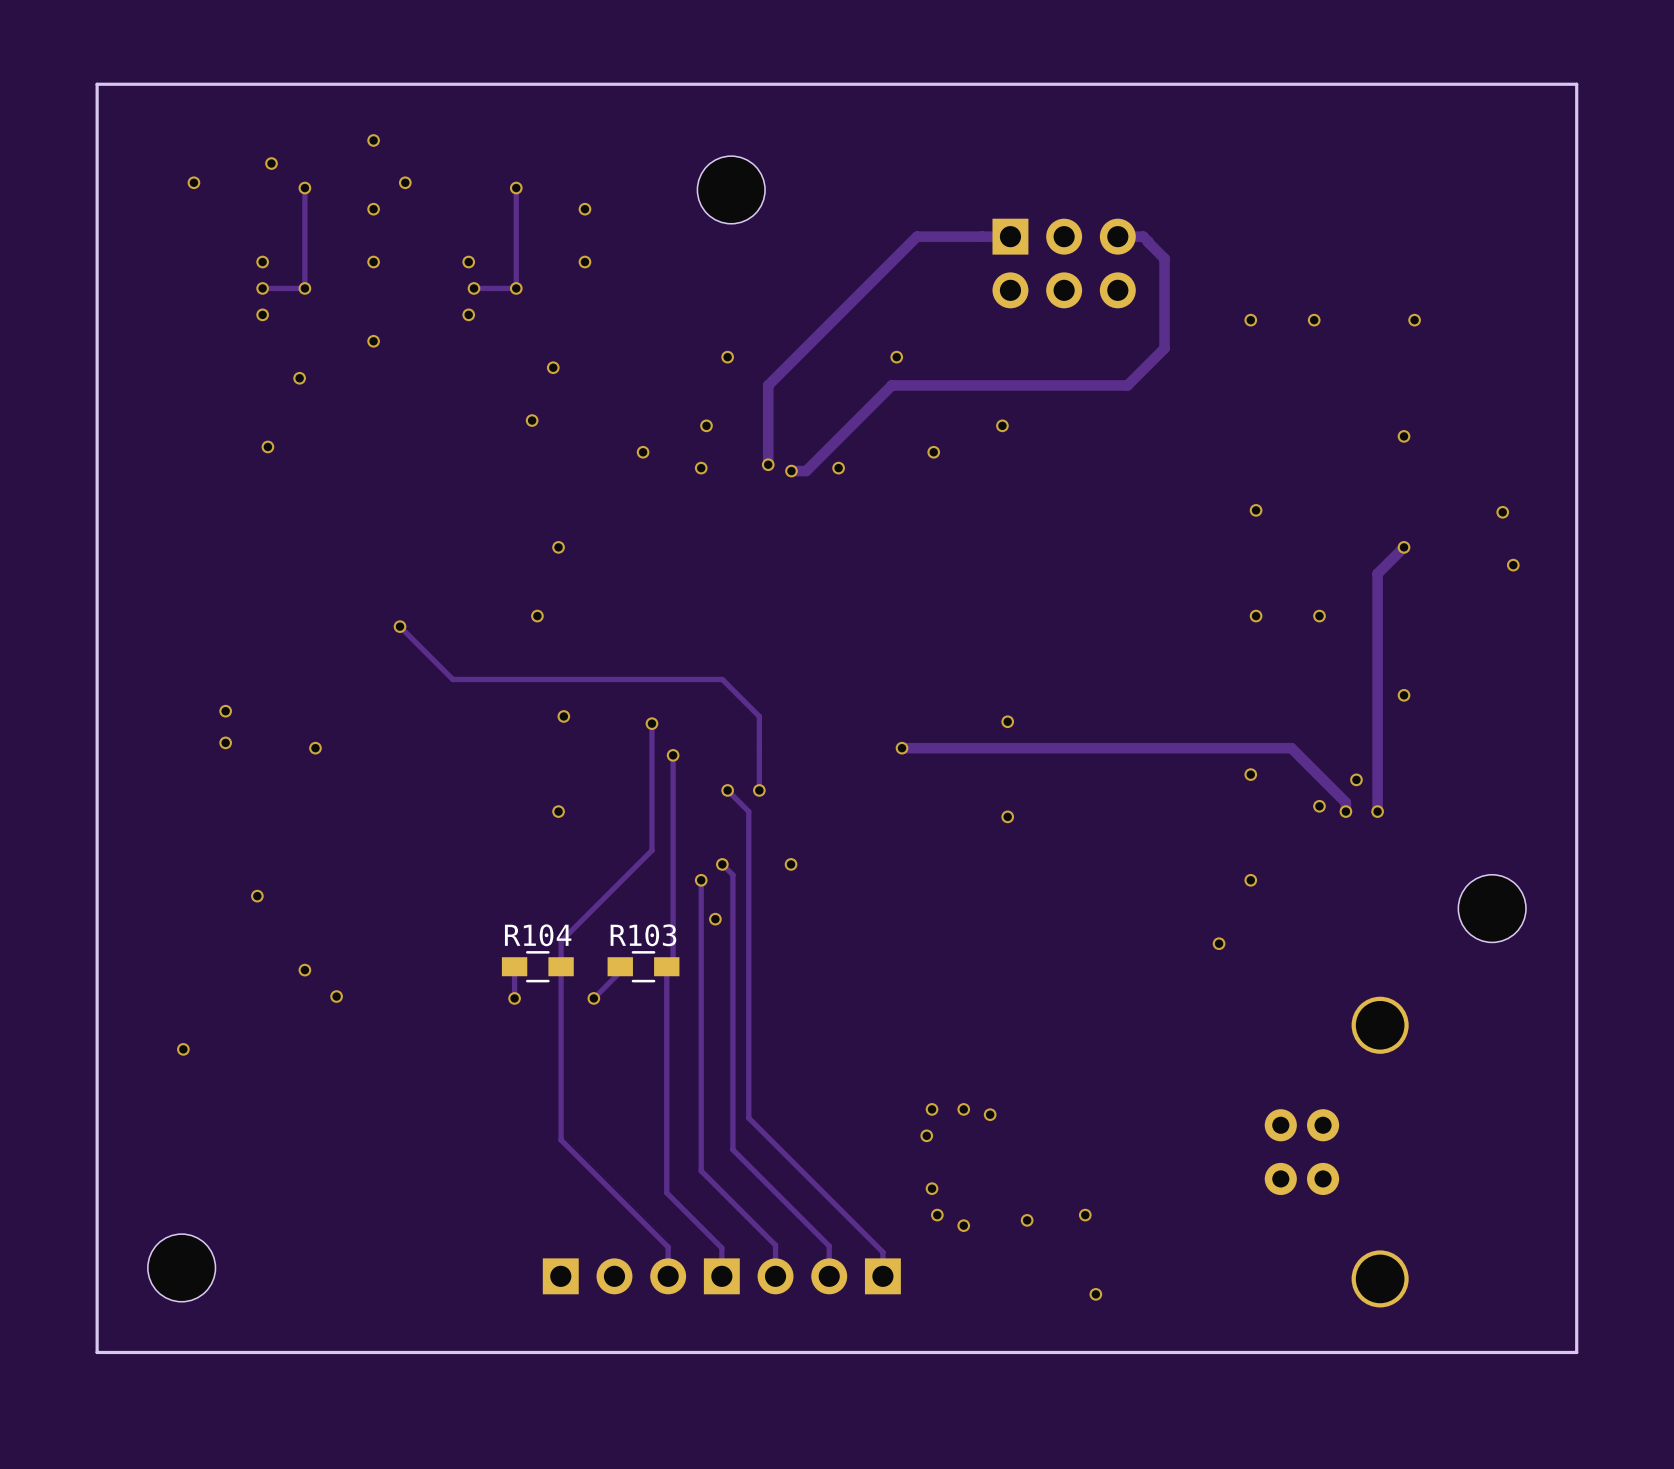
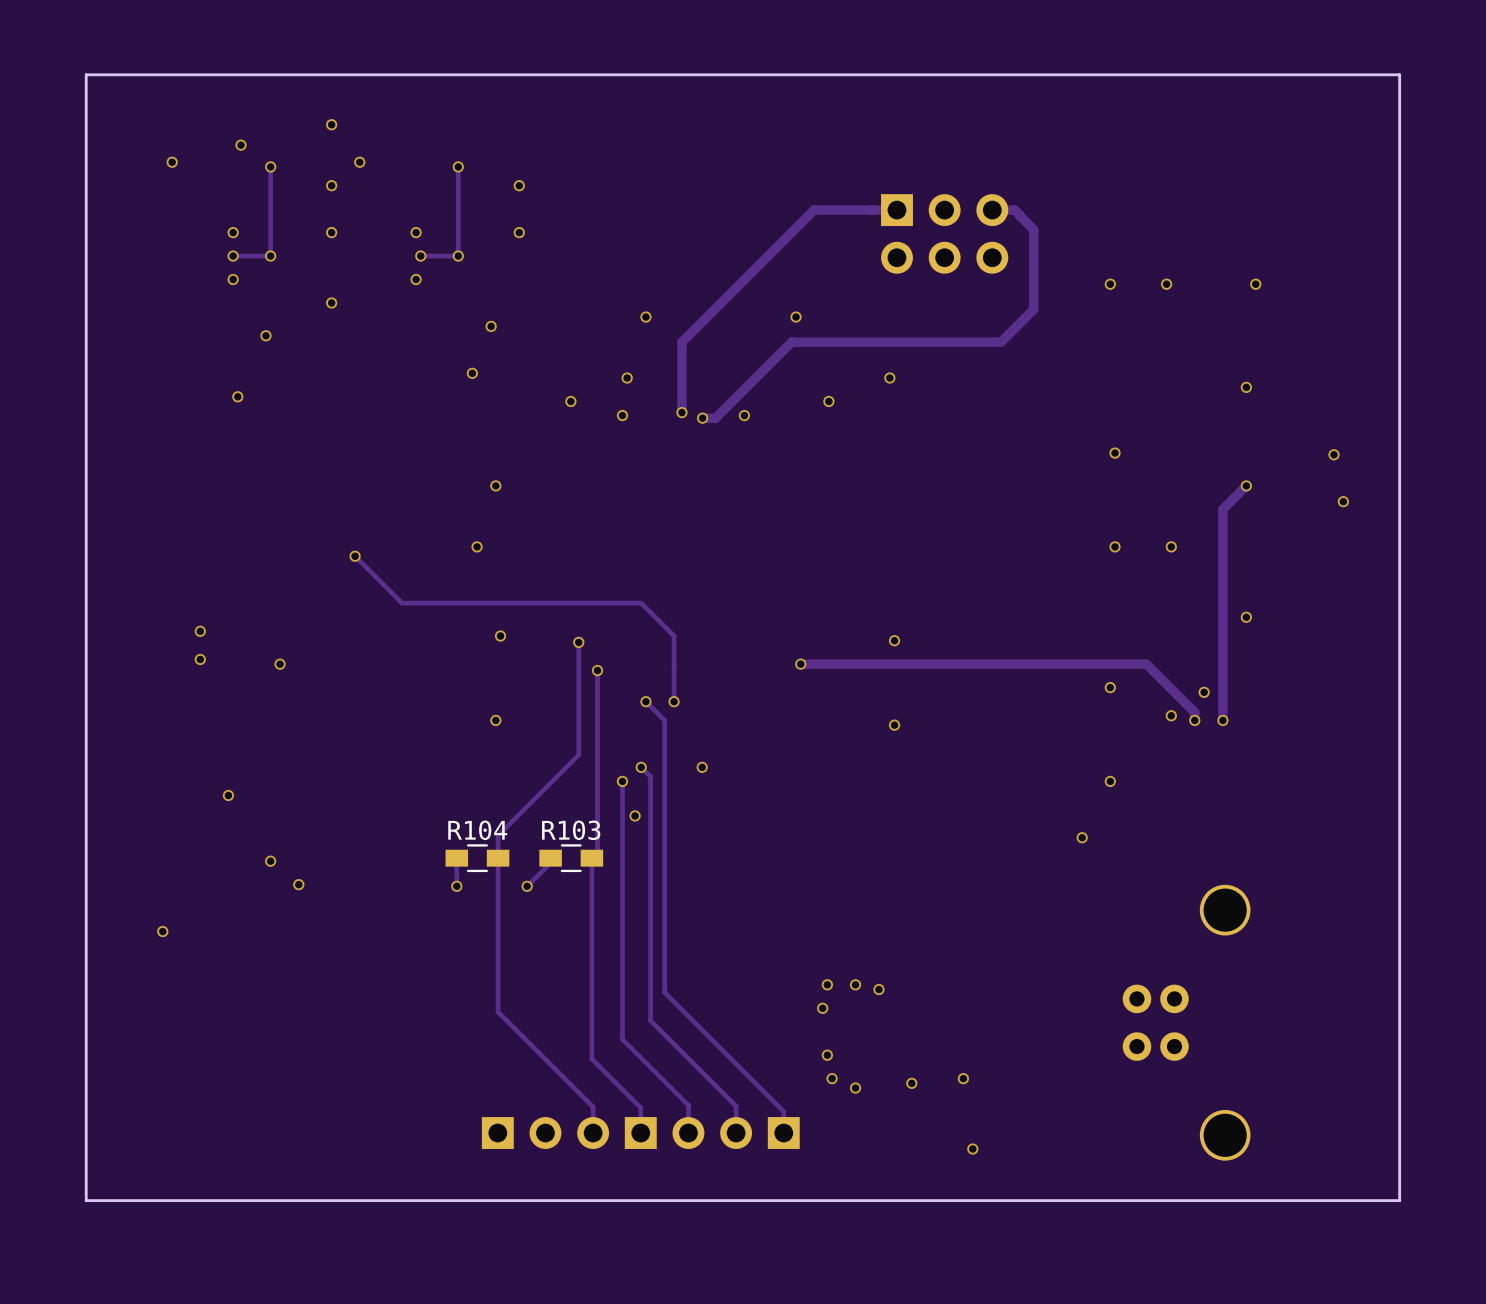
part: (731, 189) -> none
part: (1492, 908) -> none
part: (181, 1267) -> none

